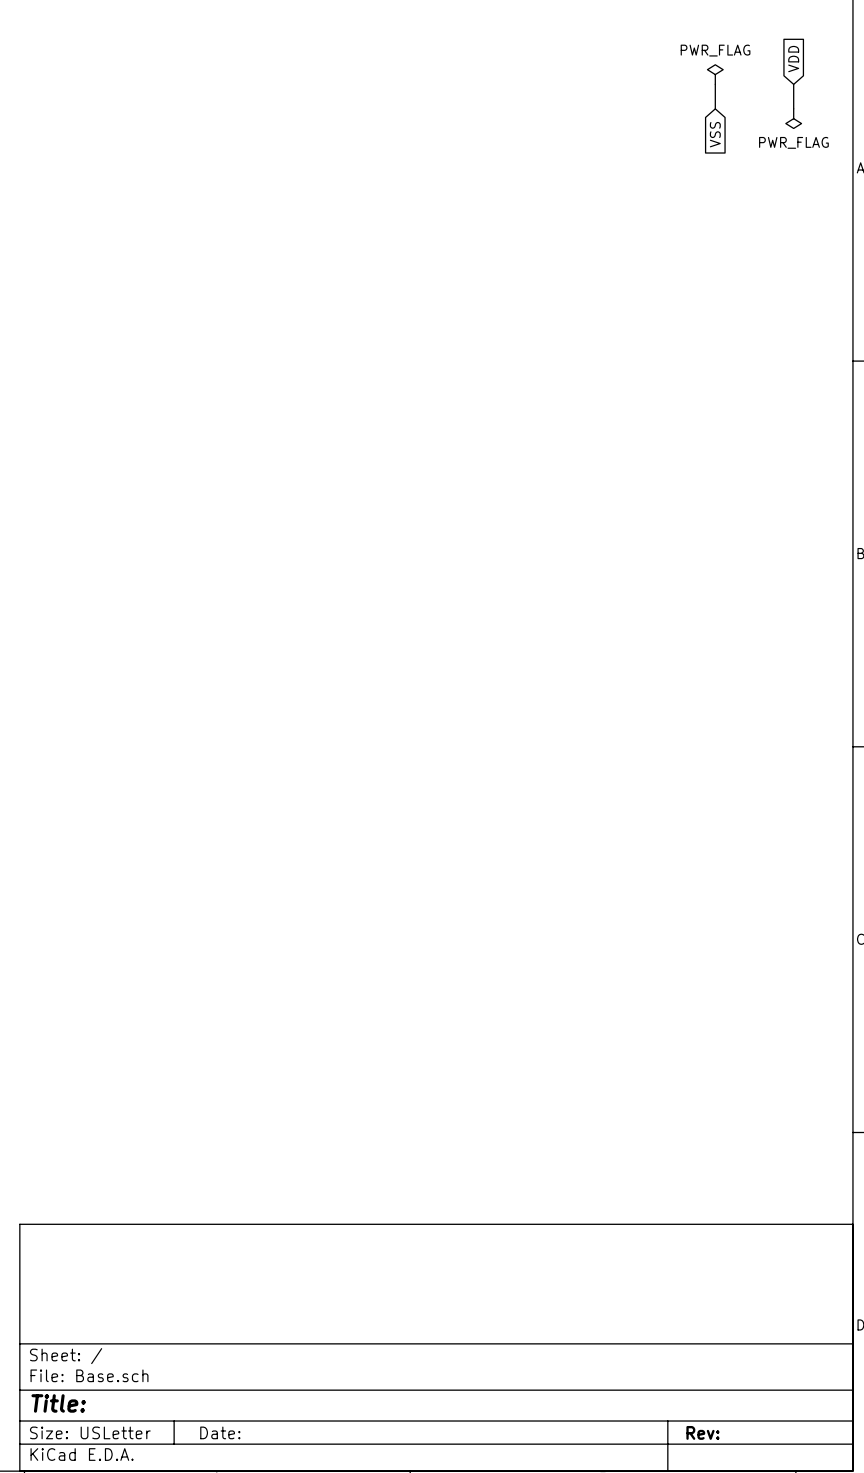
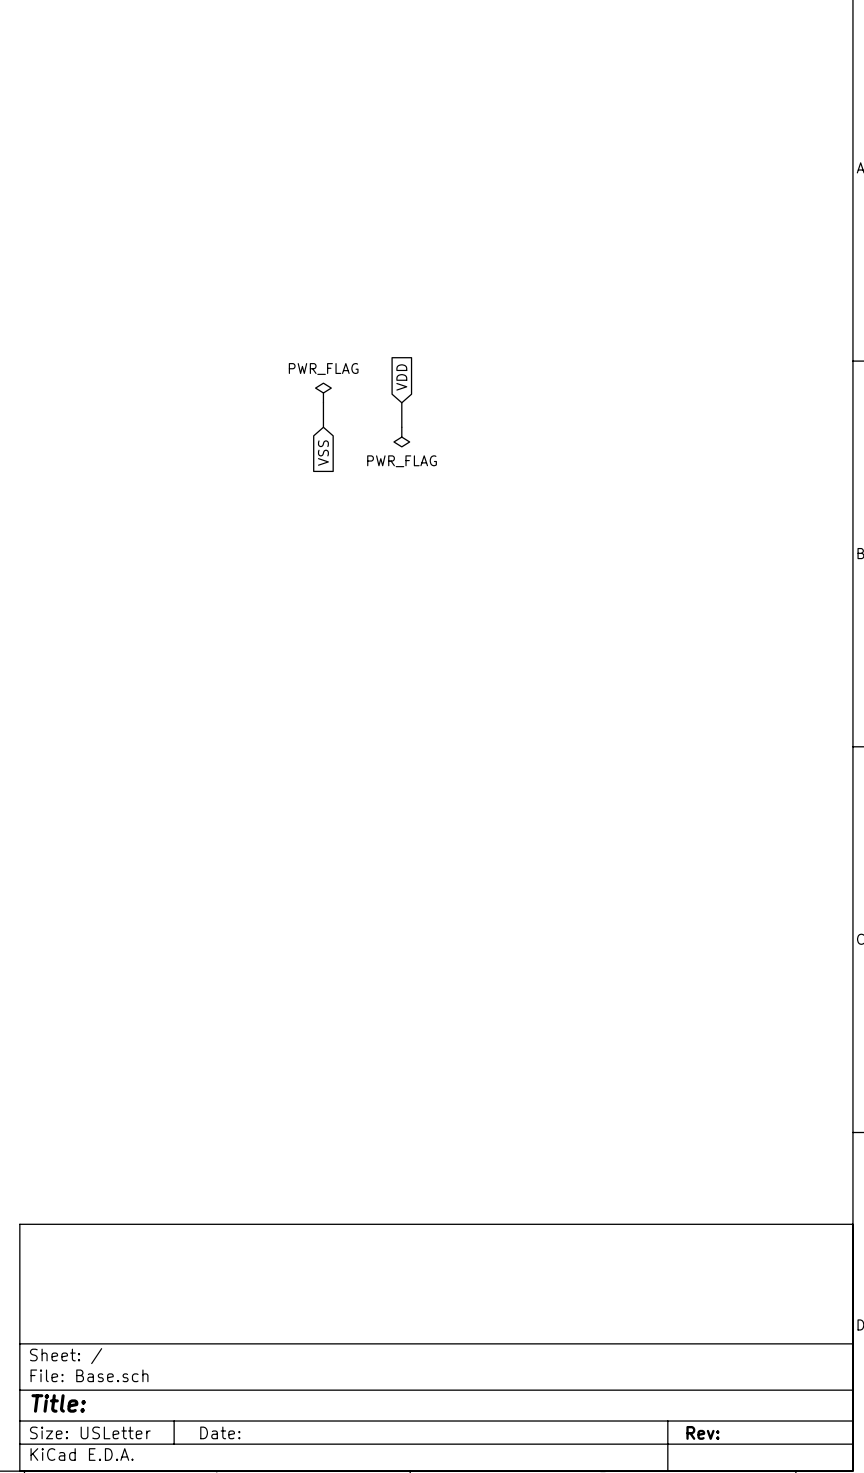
global label: VDD (793, 59) -> none
power symbol: PWR_FLAG (715, 74) -> none
wire: (715, 84) (715, 108) -> none
wire: (793, 84) (793, 108) -> none
power symbol: PWR_FLAG (793, 118) -> none
global label: VSS (715, 134) -> none
global label: none -> VDD (401, 377)
power symbol: none -> PWR_FLAG (323, 392)
wire: none -> (323, 402) (323, 427)
wire: none -> (401, 402) (401, 427)
power symbol: none -> PWR_FLAG (401, 437)
global label: none -> VSS (323, 453)

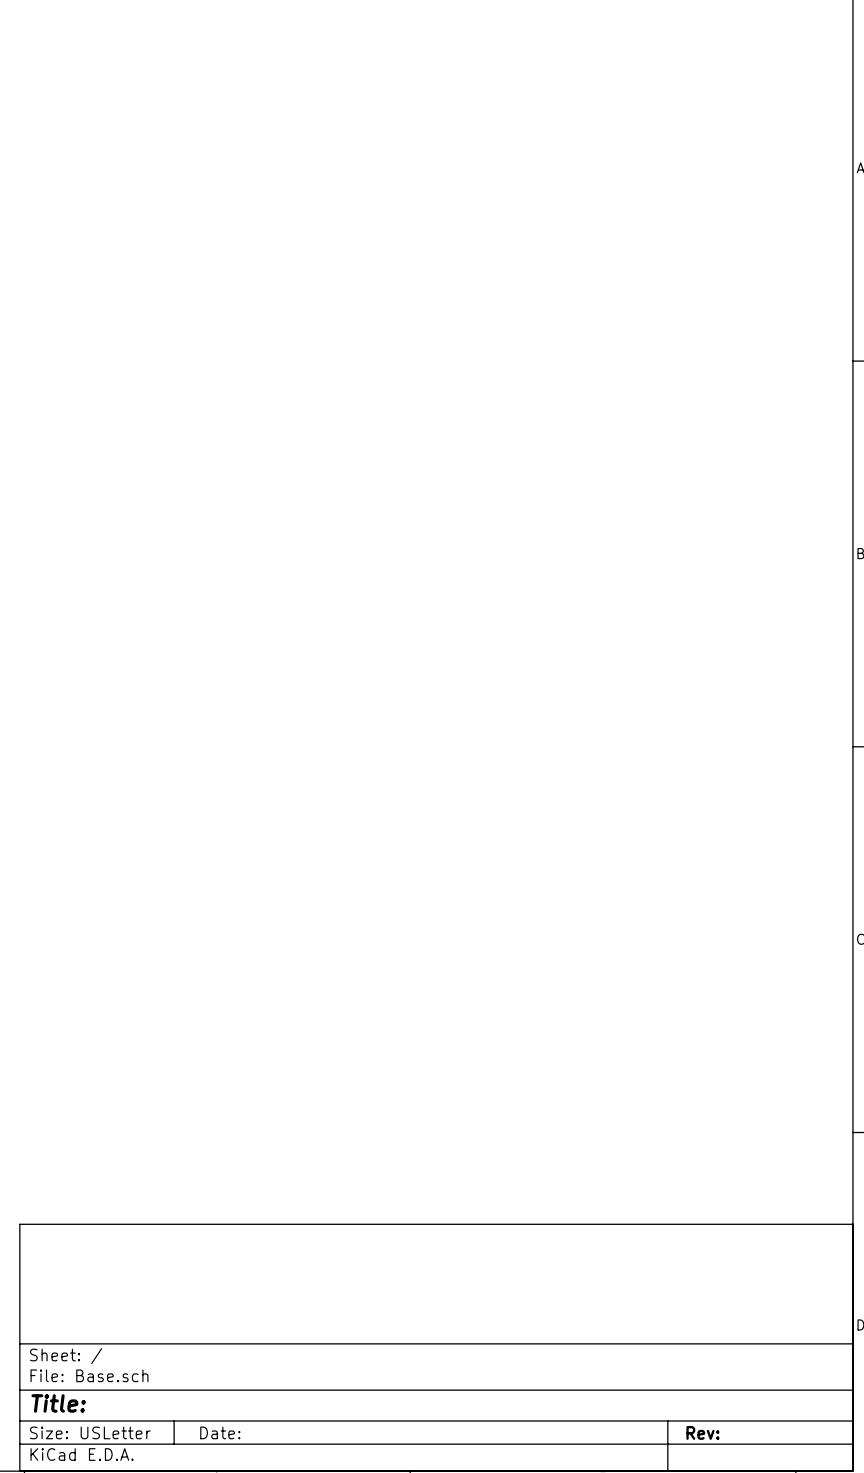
global label: VDD (401, 377) -> none
power symbol: PWR_FLAG (323, 392) -> none
wire: (323, 402) (323, 427) -> none
wire: (401, 402) (401, 427) -> none
power symbol: PWR_FLAG (401, 437) -> none
global label: VSS (323, 453) -> none

